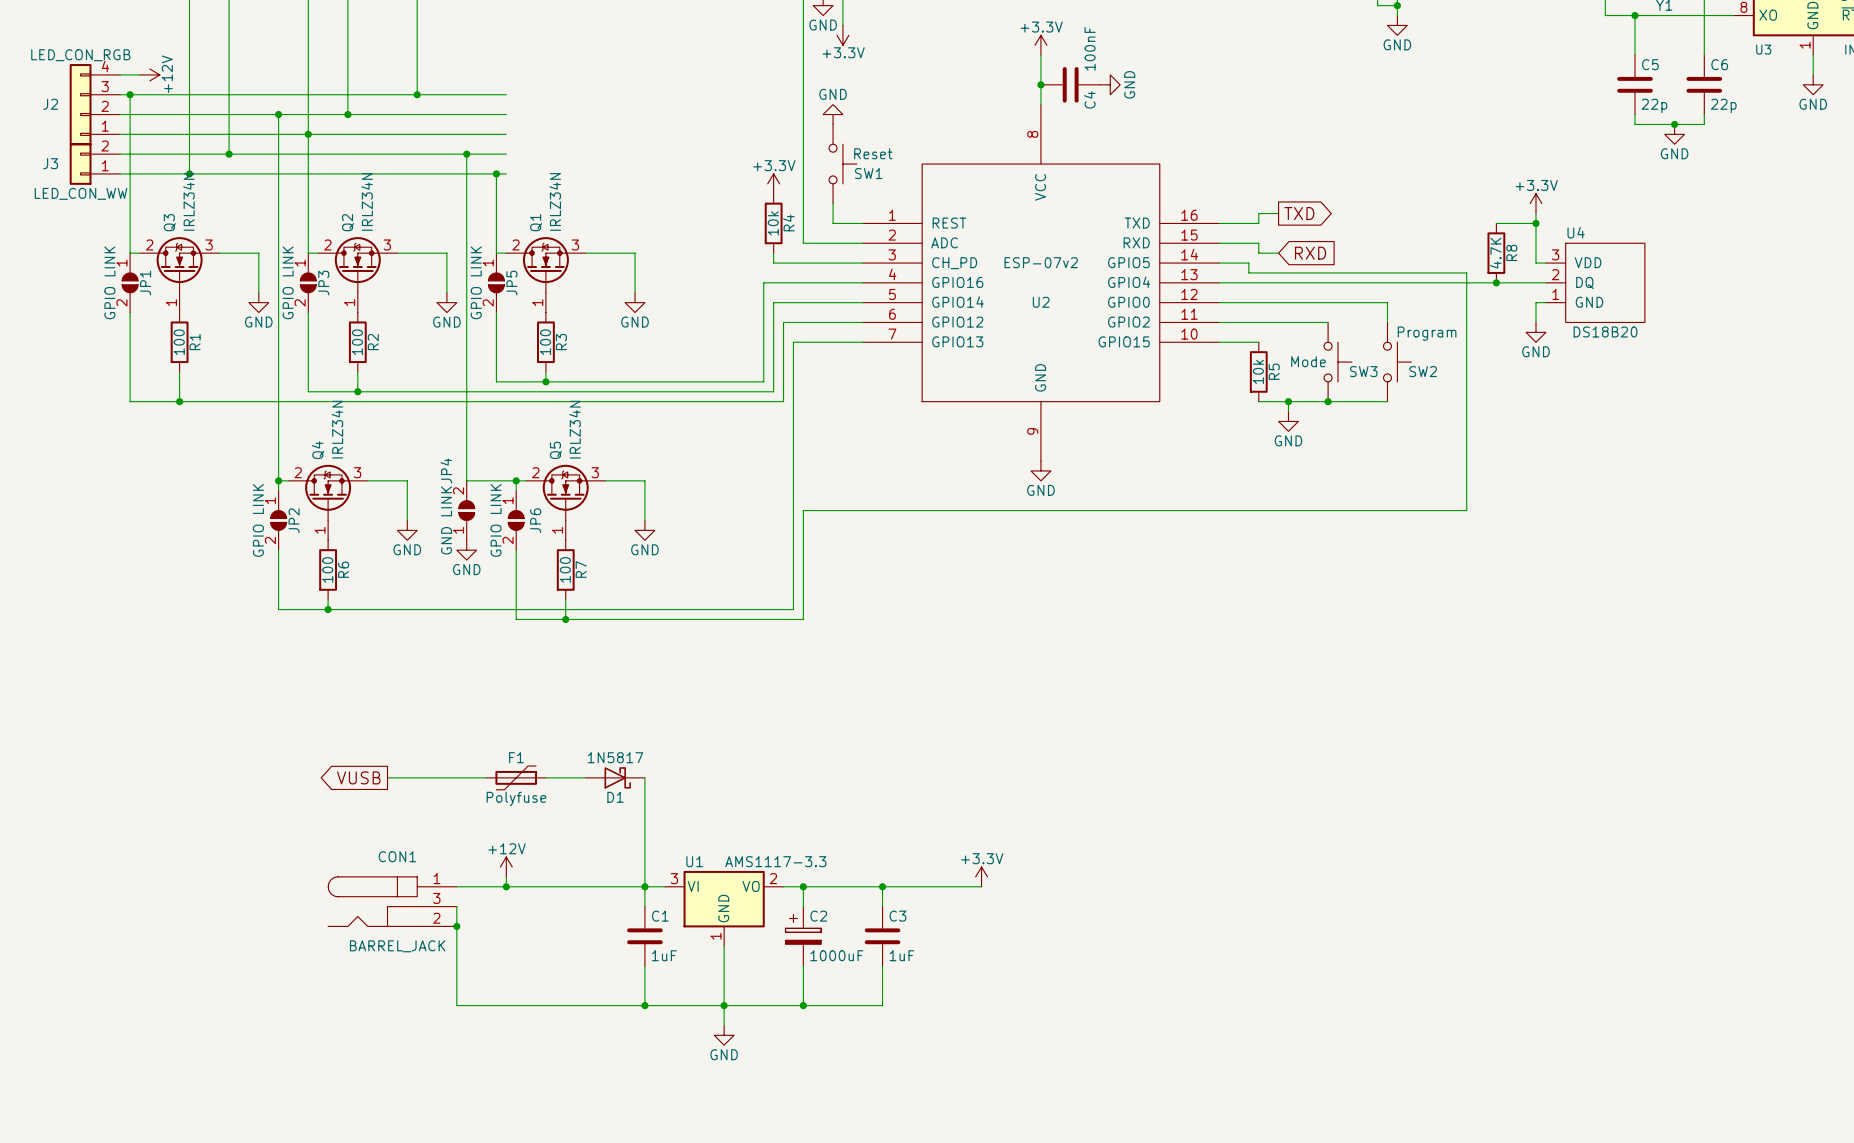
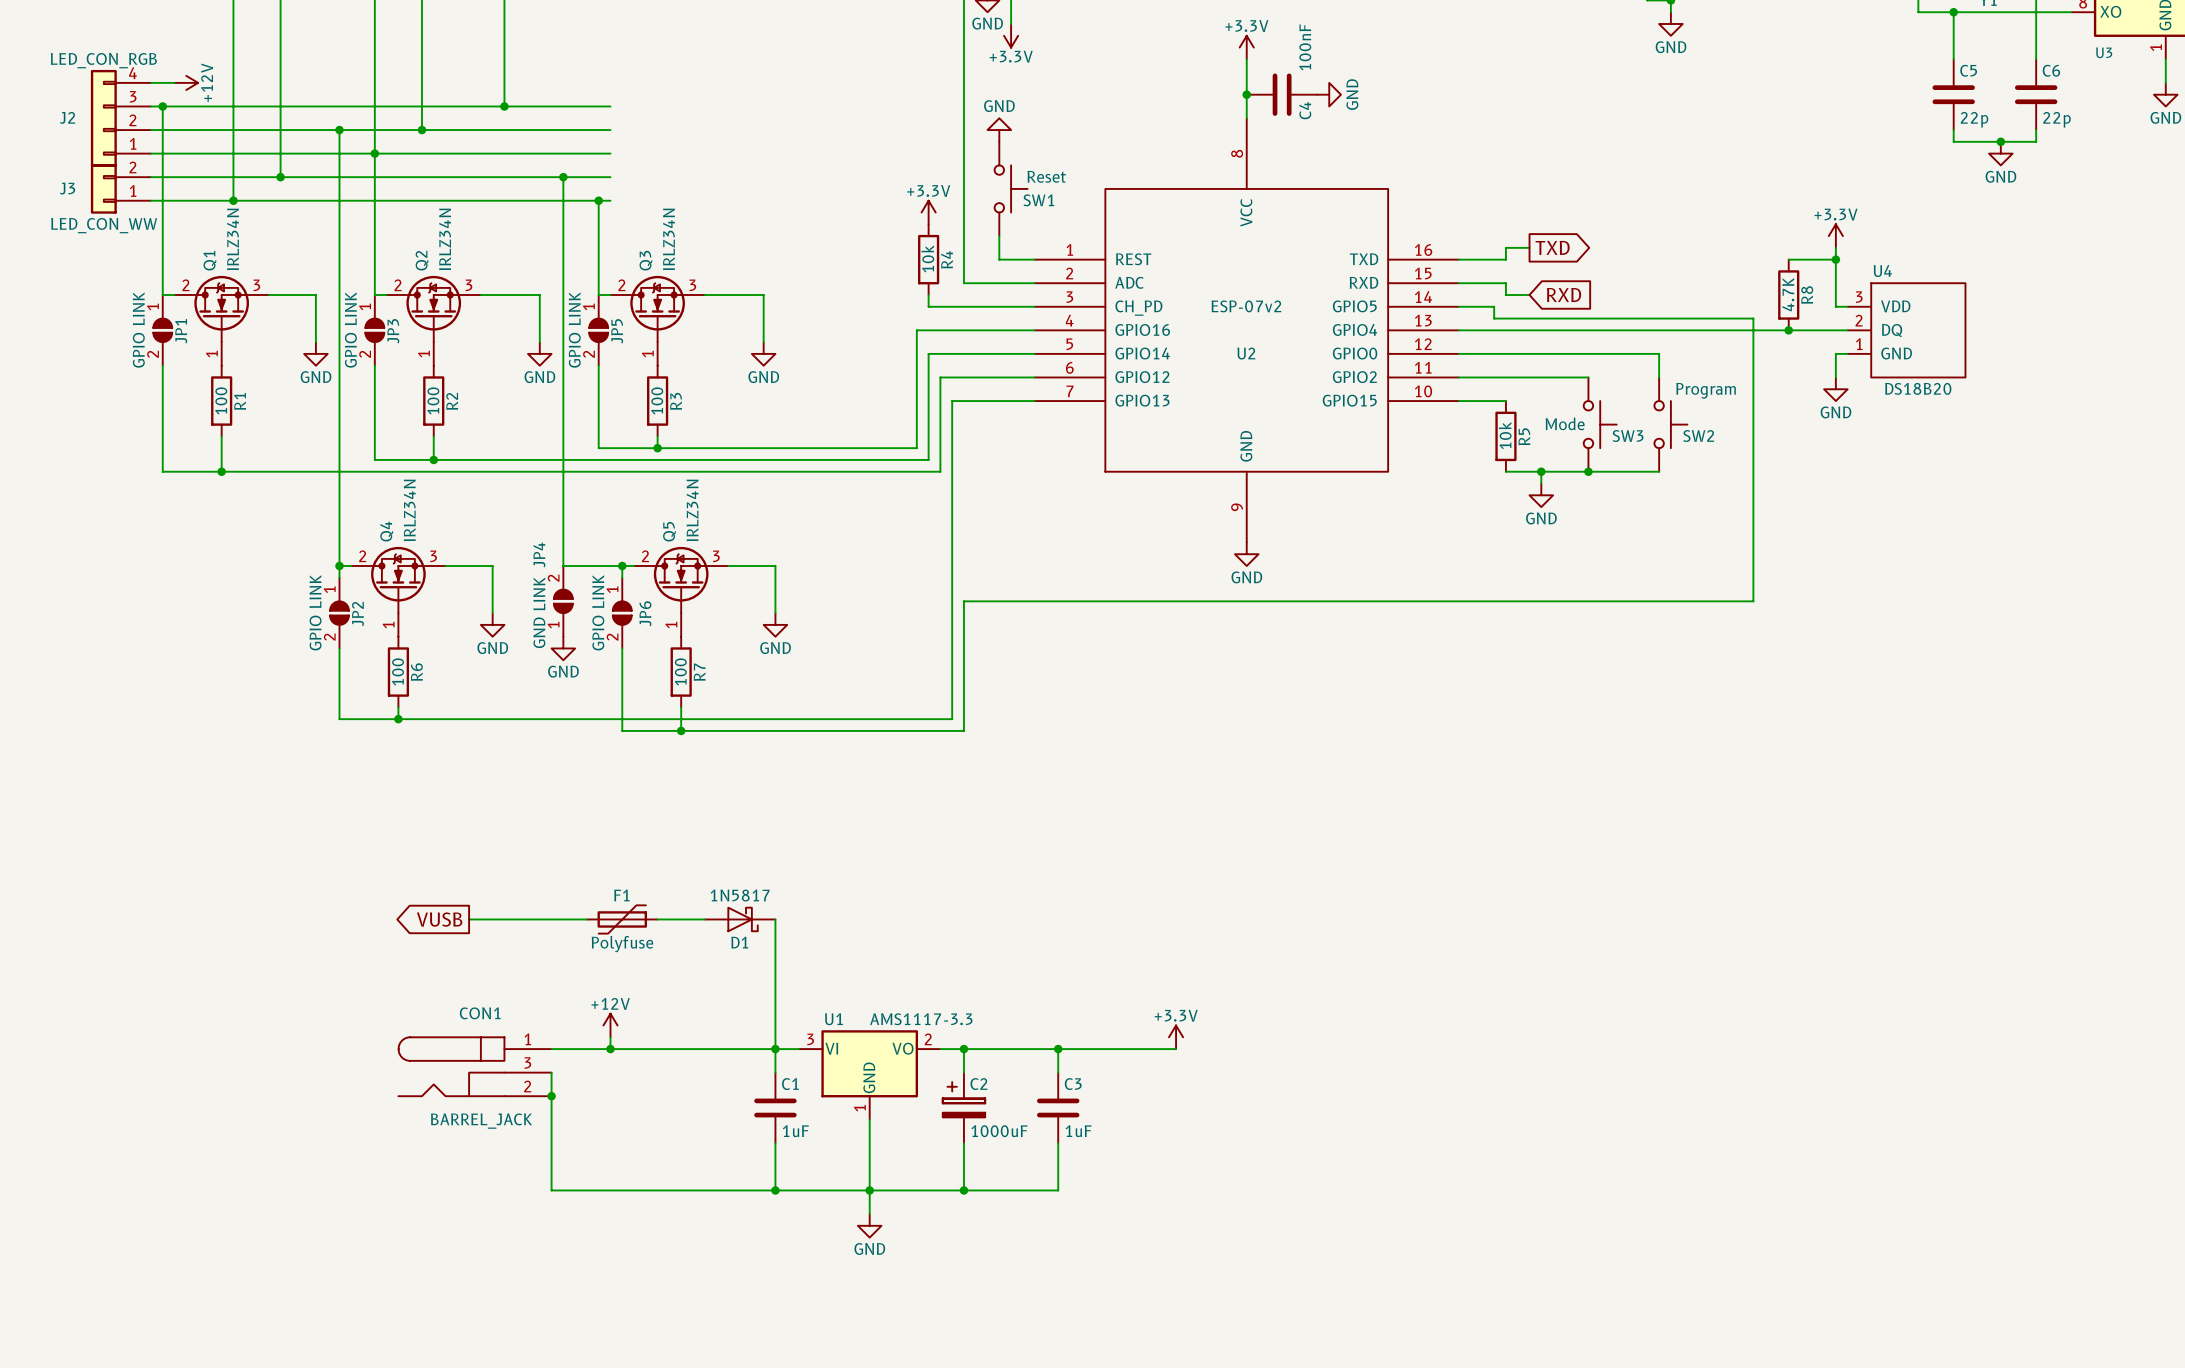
Q3 name: Q3 (169, 222) -> Q1 (210, 260)
Q1 name: Q1 (536, 222) -> Q3 (645, 260)

